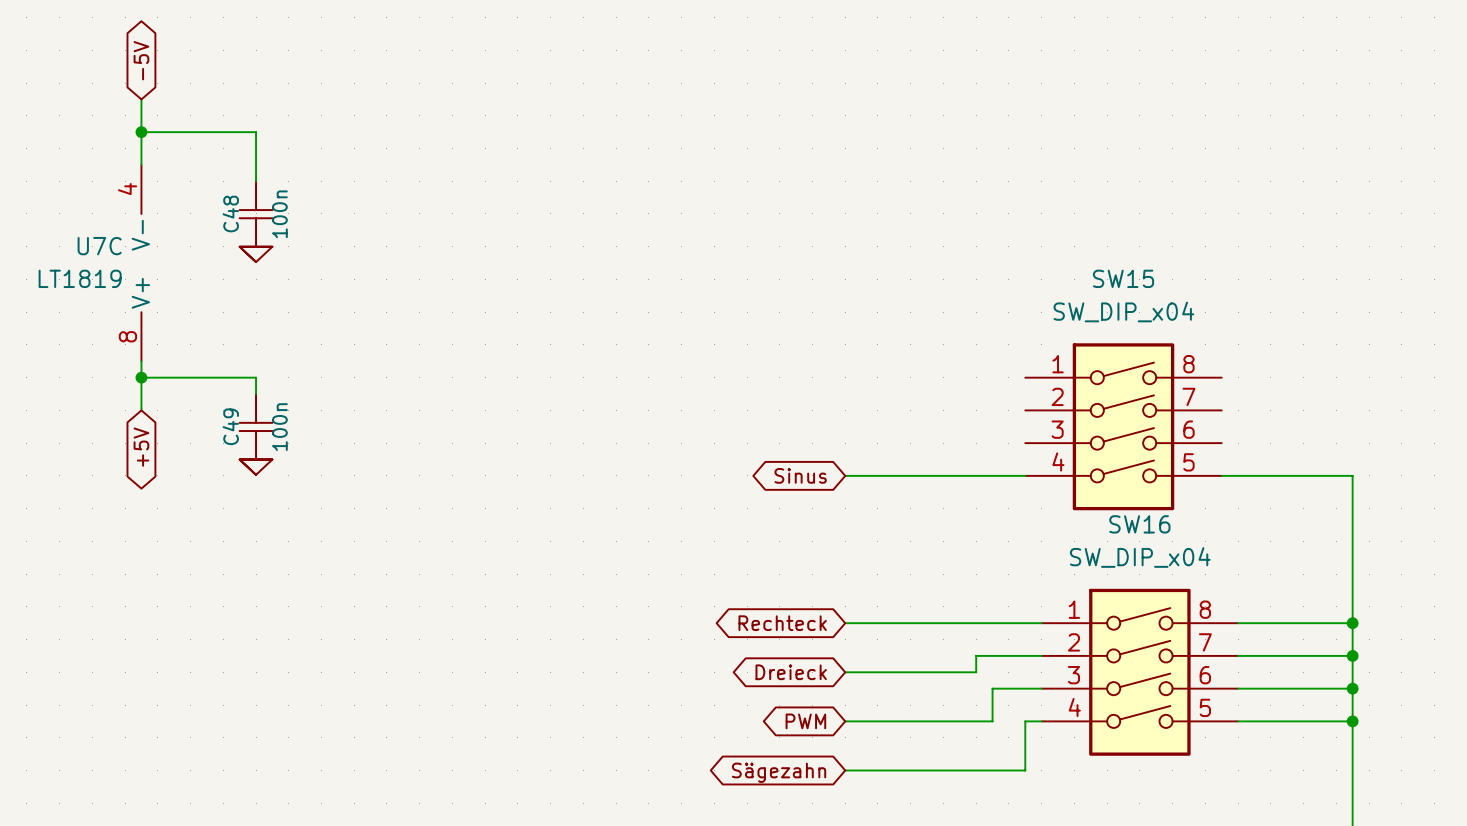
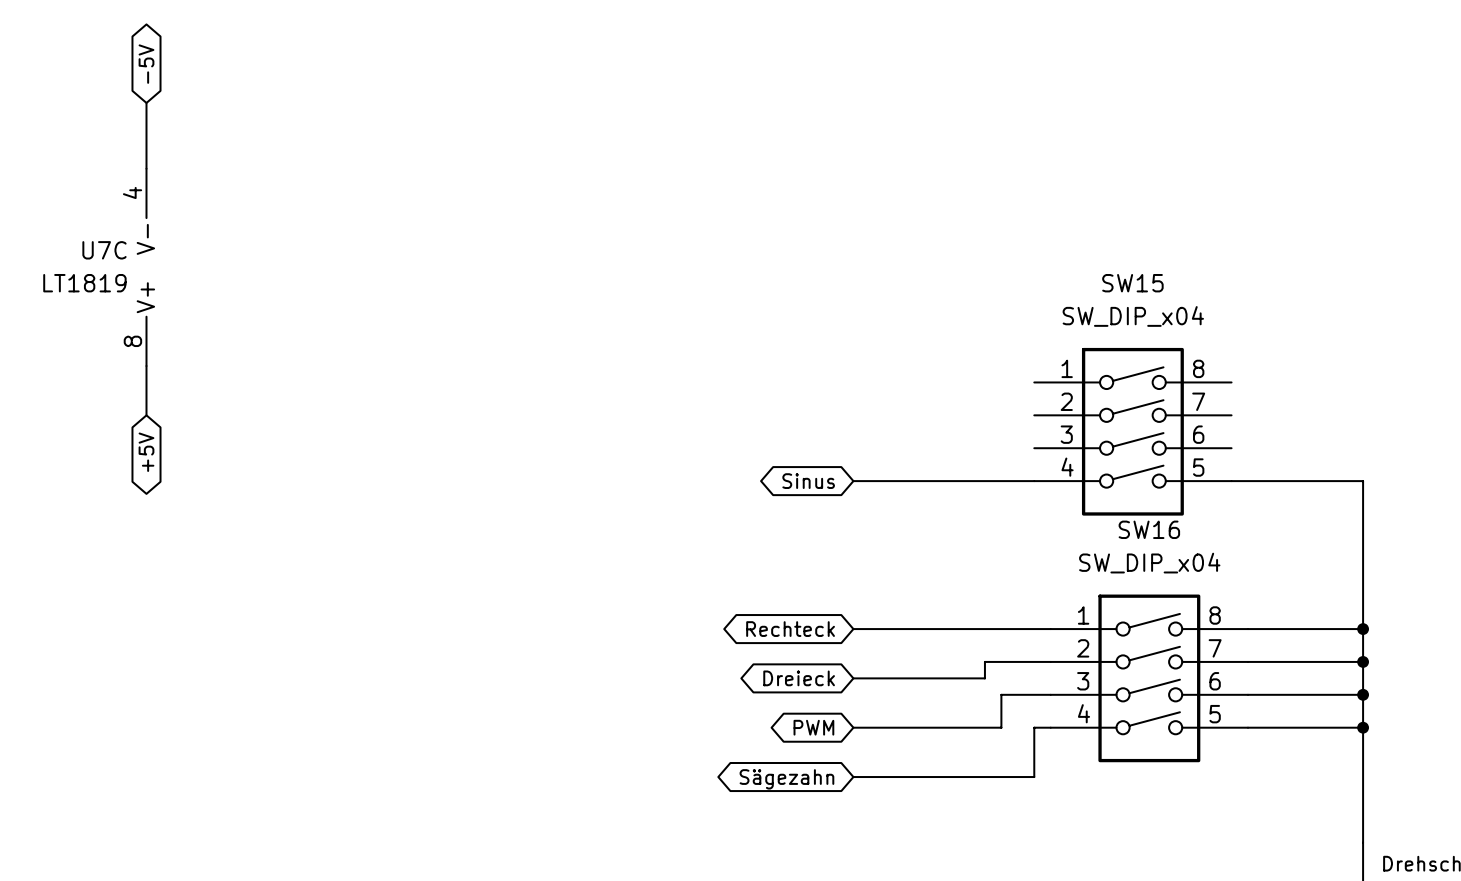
wire: (141, 132) (256, 132) (256, 181) -> none
junction: (141, 132) -> none
C48: 100n (256, 213) -> none
power symbol: (256, 254) -> none
wire: (141, 377) (256, 377) (256, 394) -> none
junction: (141, 377) -> none
C49: 100n (256, 426) -> none
power symbol: (256, 467) -> none

